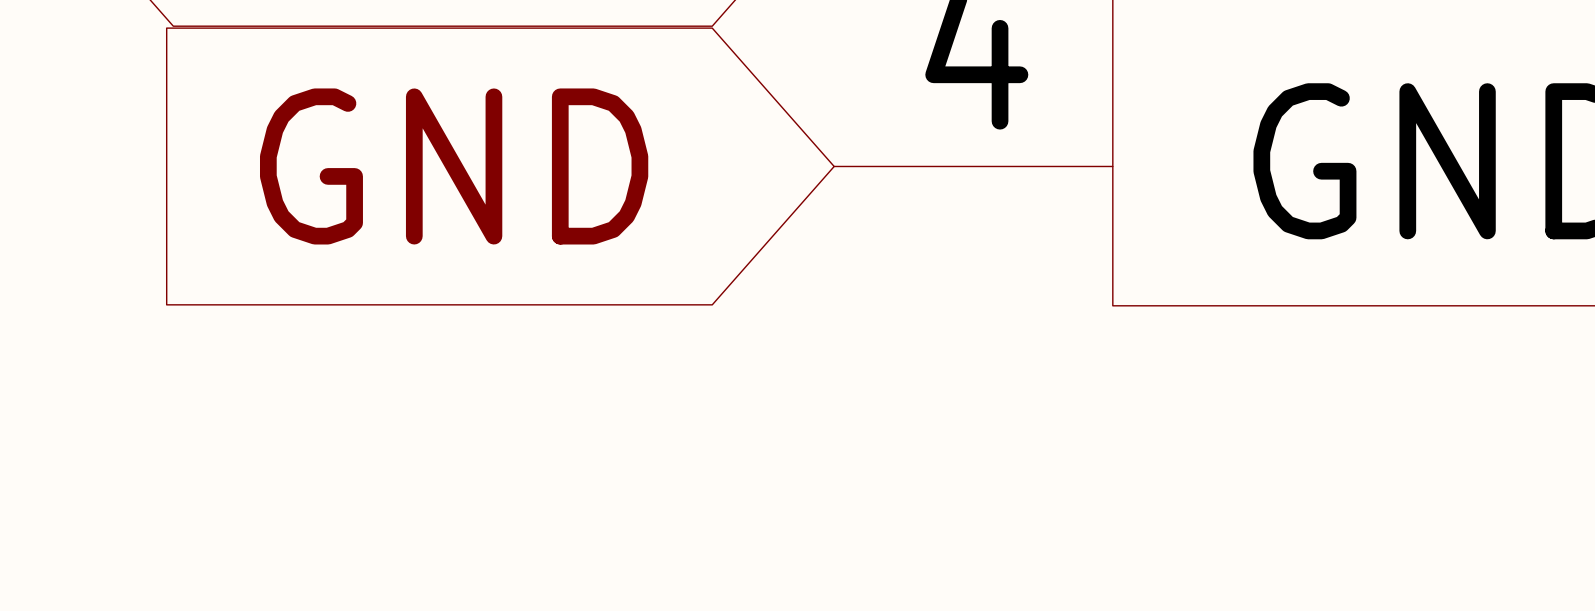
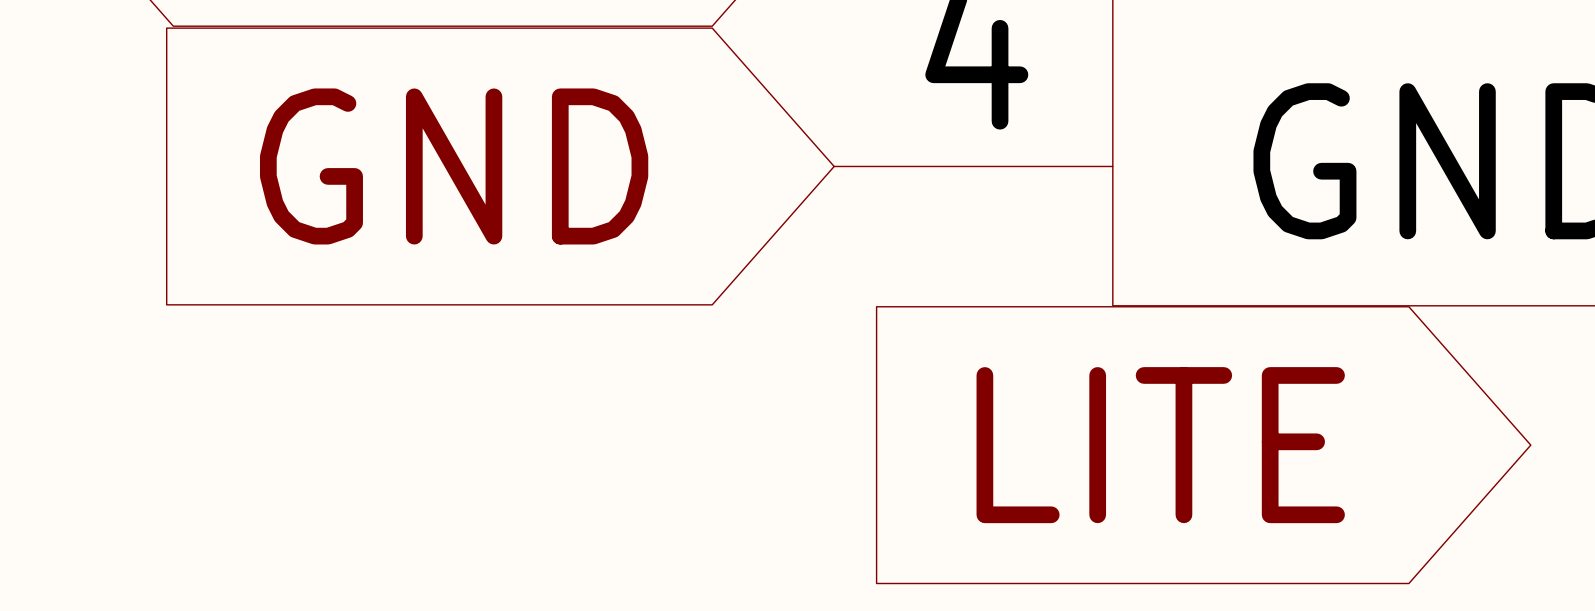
global label: none -> LITE (1160, 445)

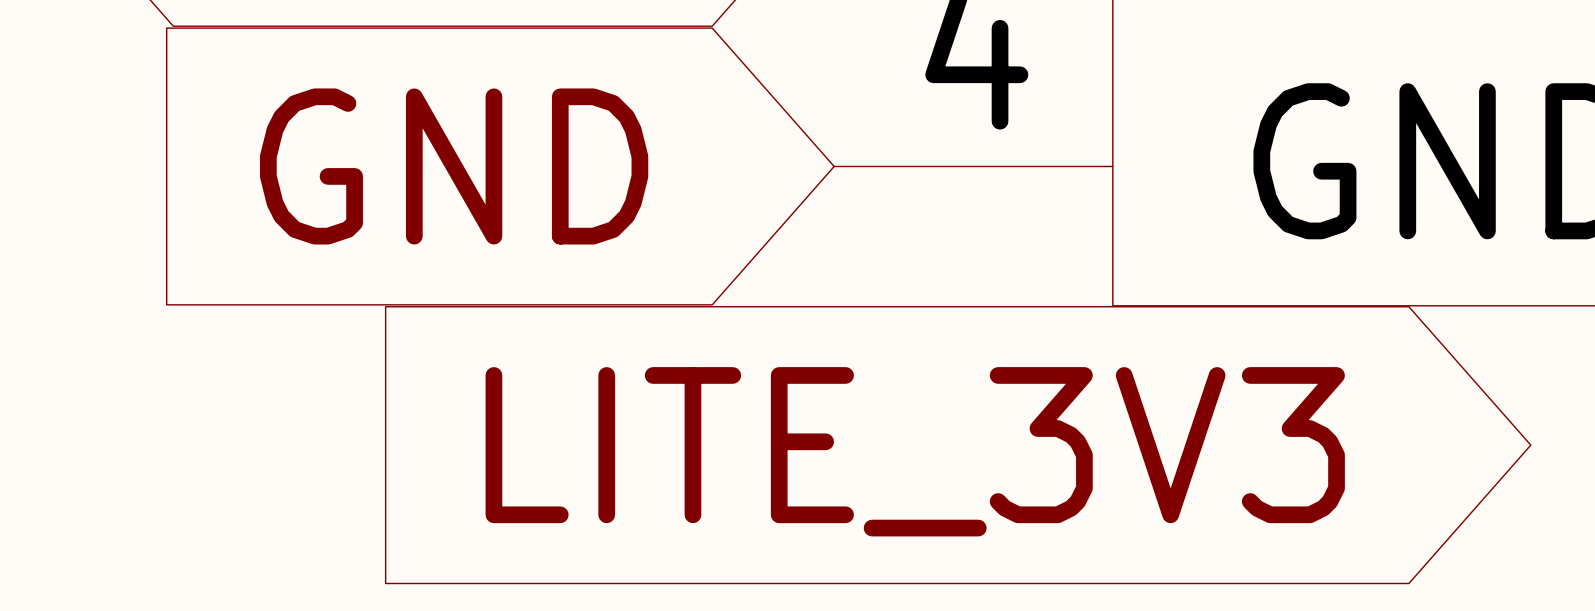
global label: LITE (1160, 445) -> LITE_3V3 (915, 451)

